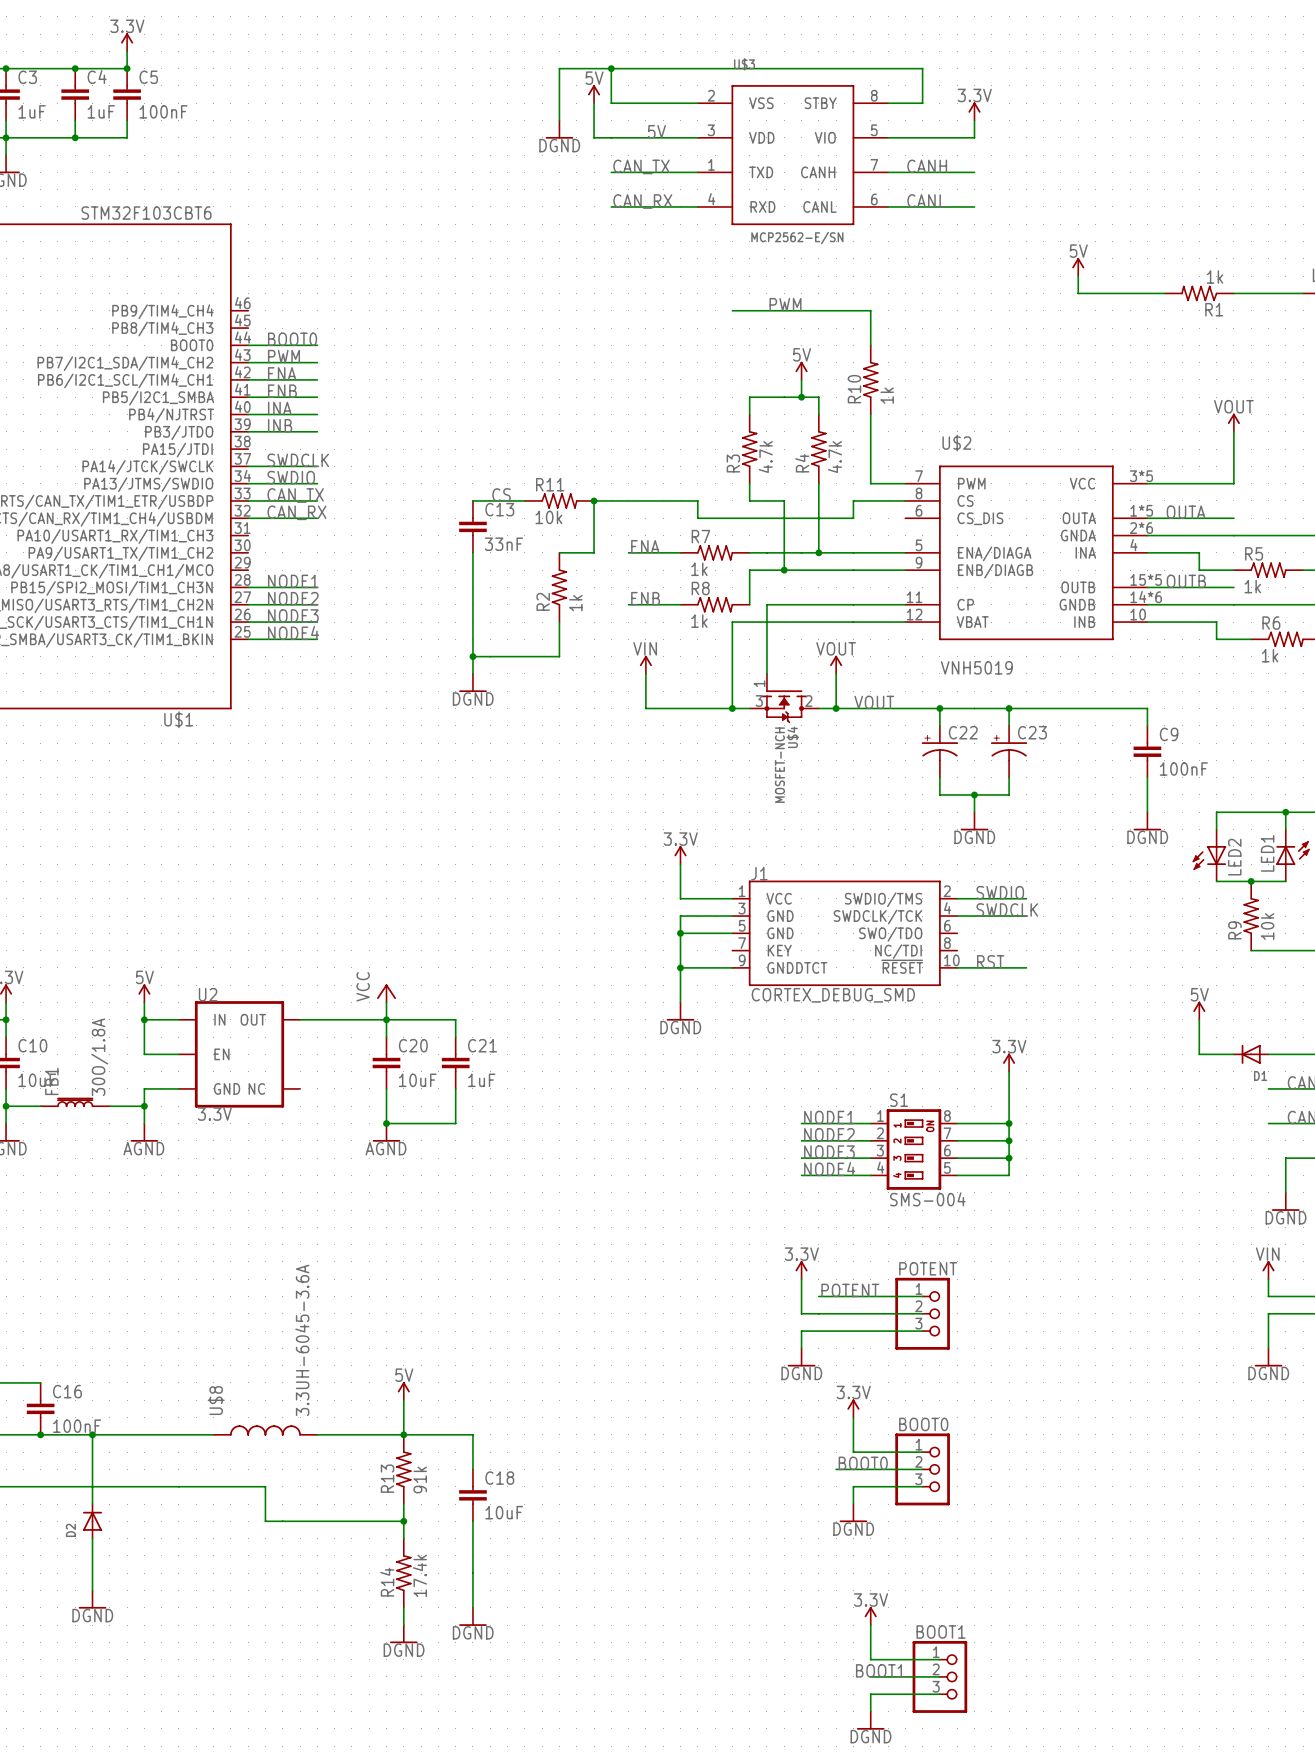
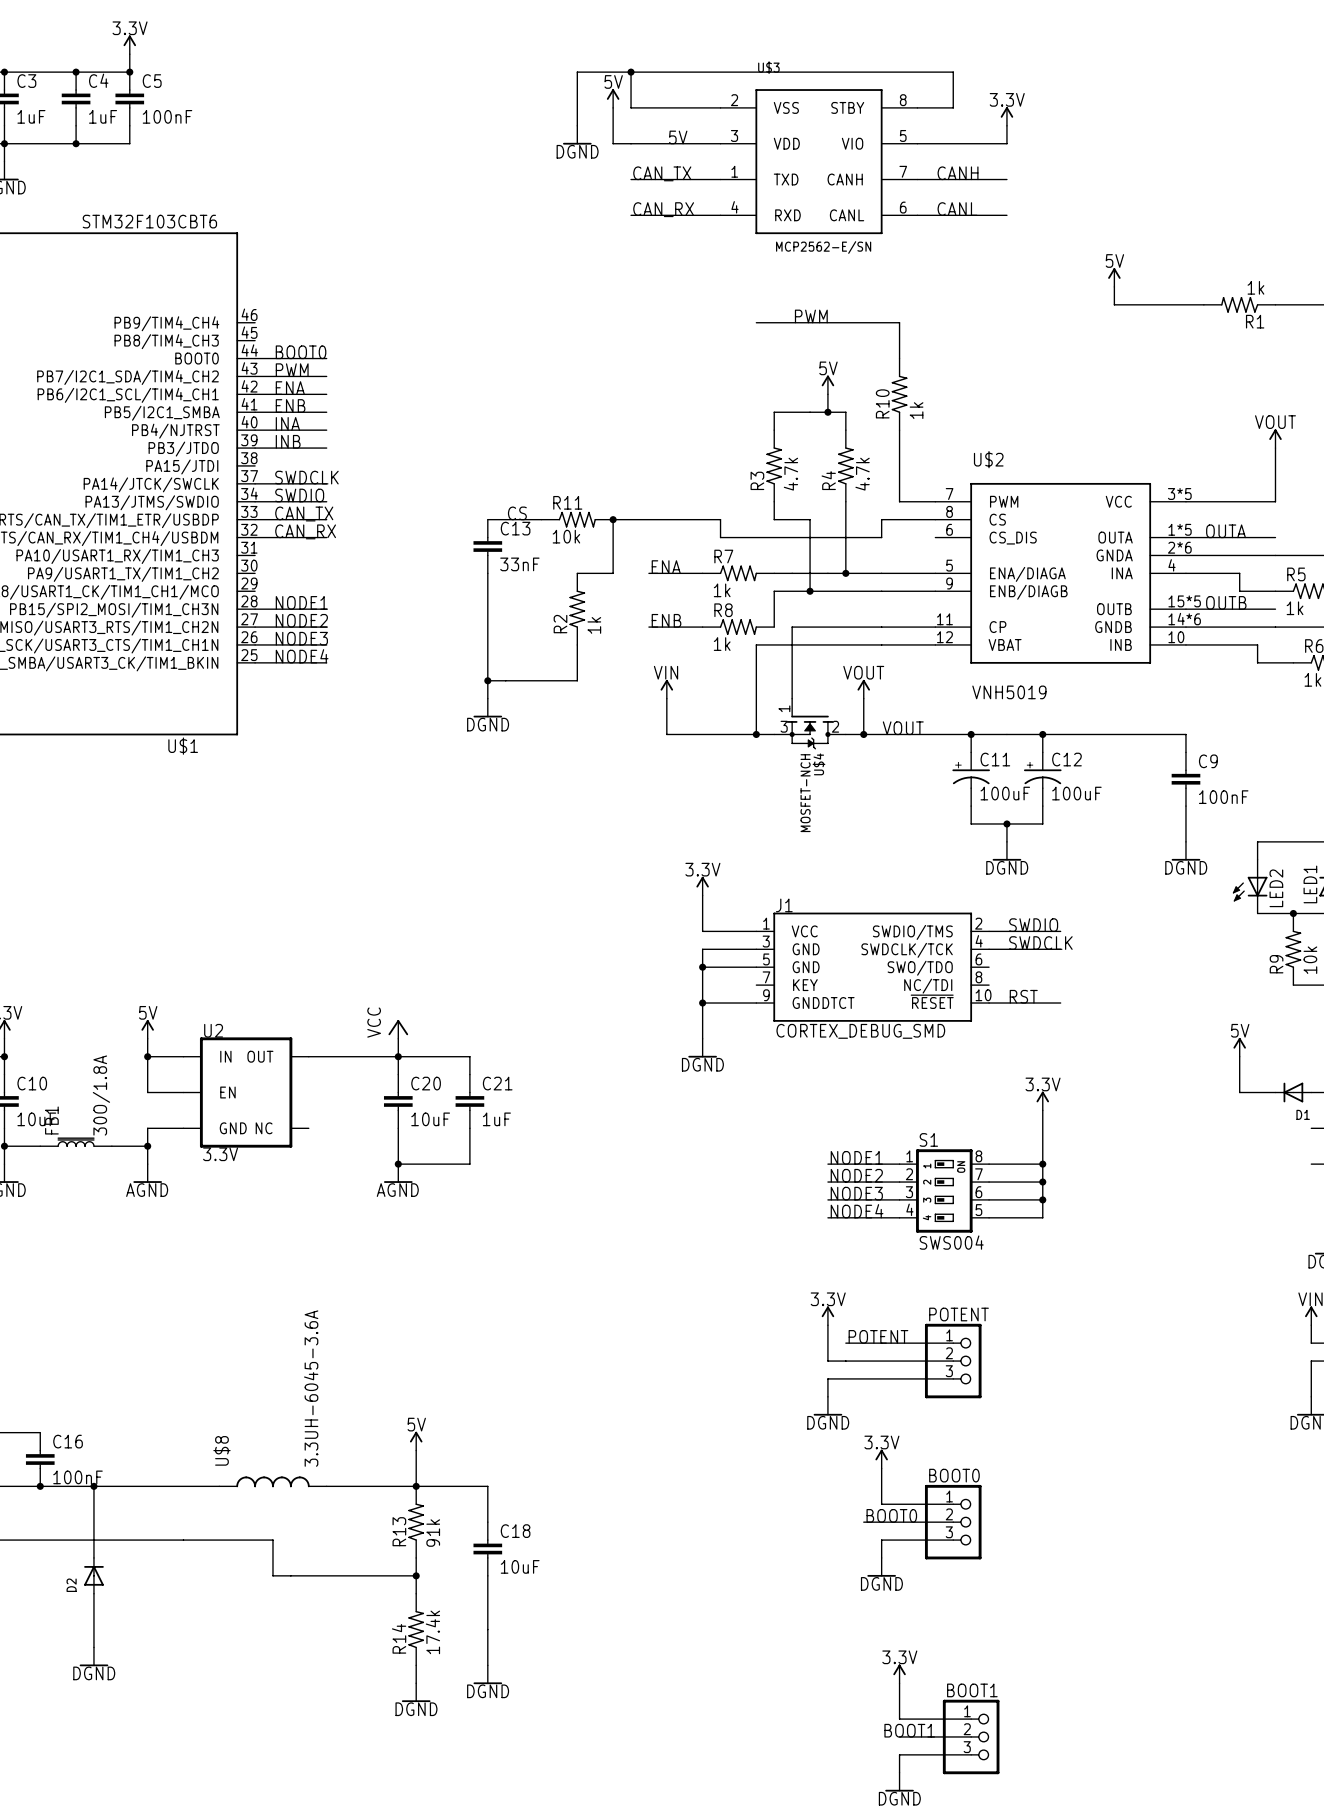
C22 name: C22 (963, 732) -> C11 (995, 759)
C23 name: C23 (1032, 732) -> C12 (1066, 759)
C22 value: none -> 100uF (1005, 793)
C23 value: none -> 100uF (1076, 793)
S1 value: SMS-004 (927, 1199) -> SWS004 (951, 1242)

